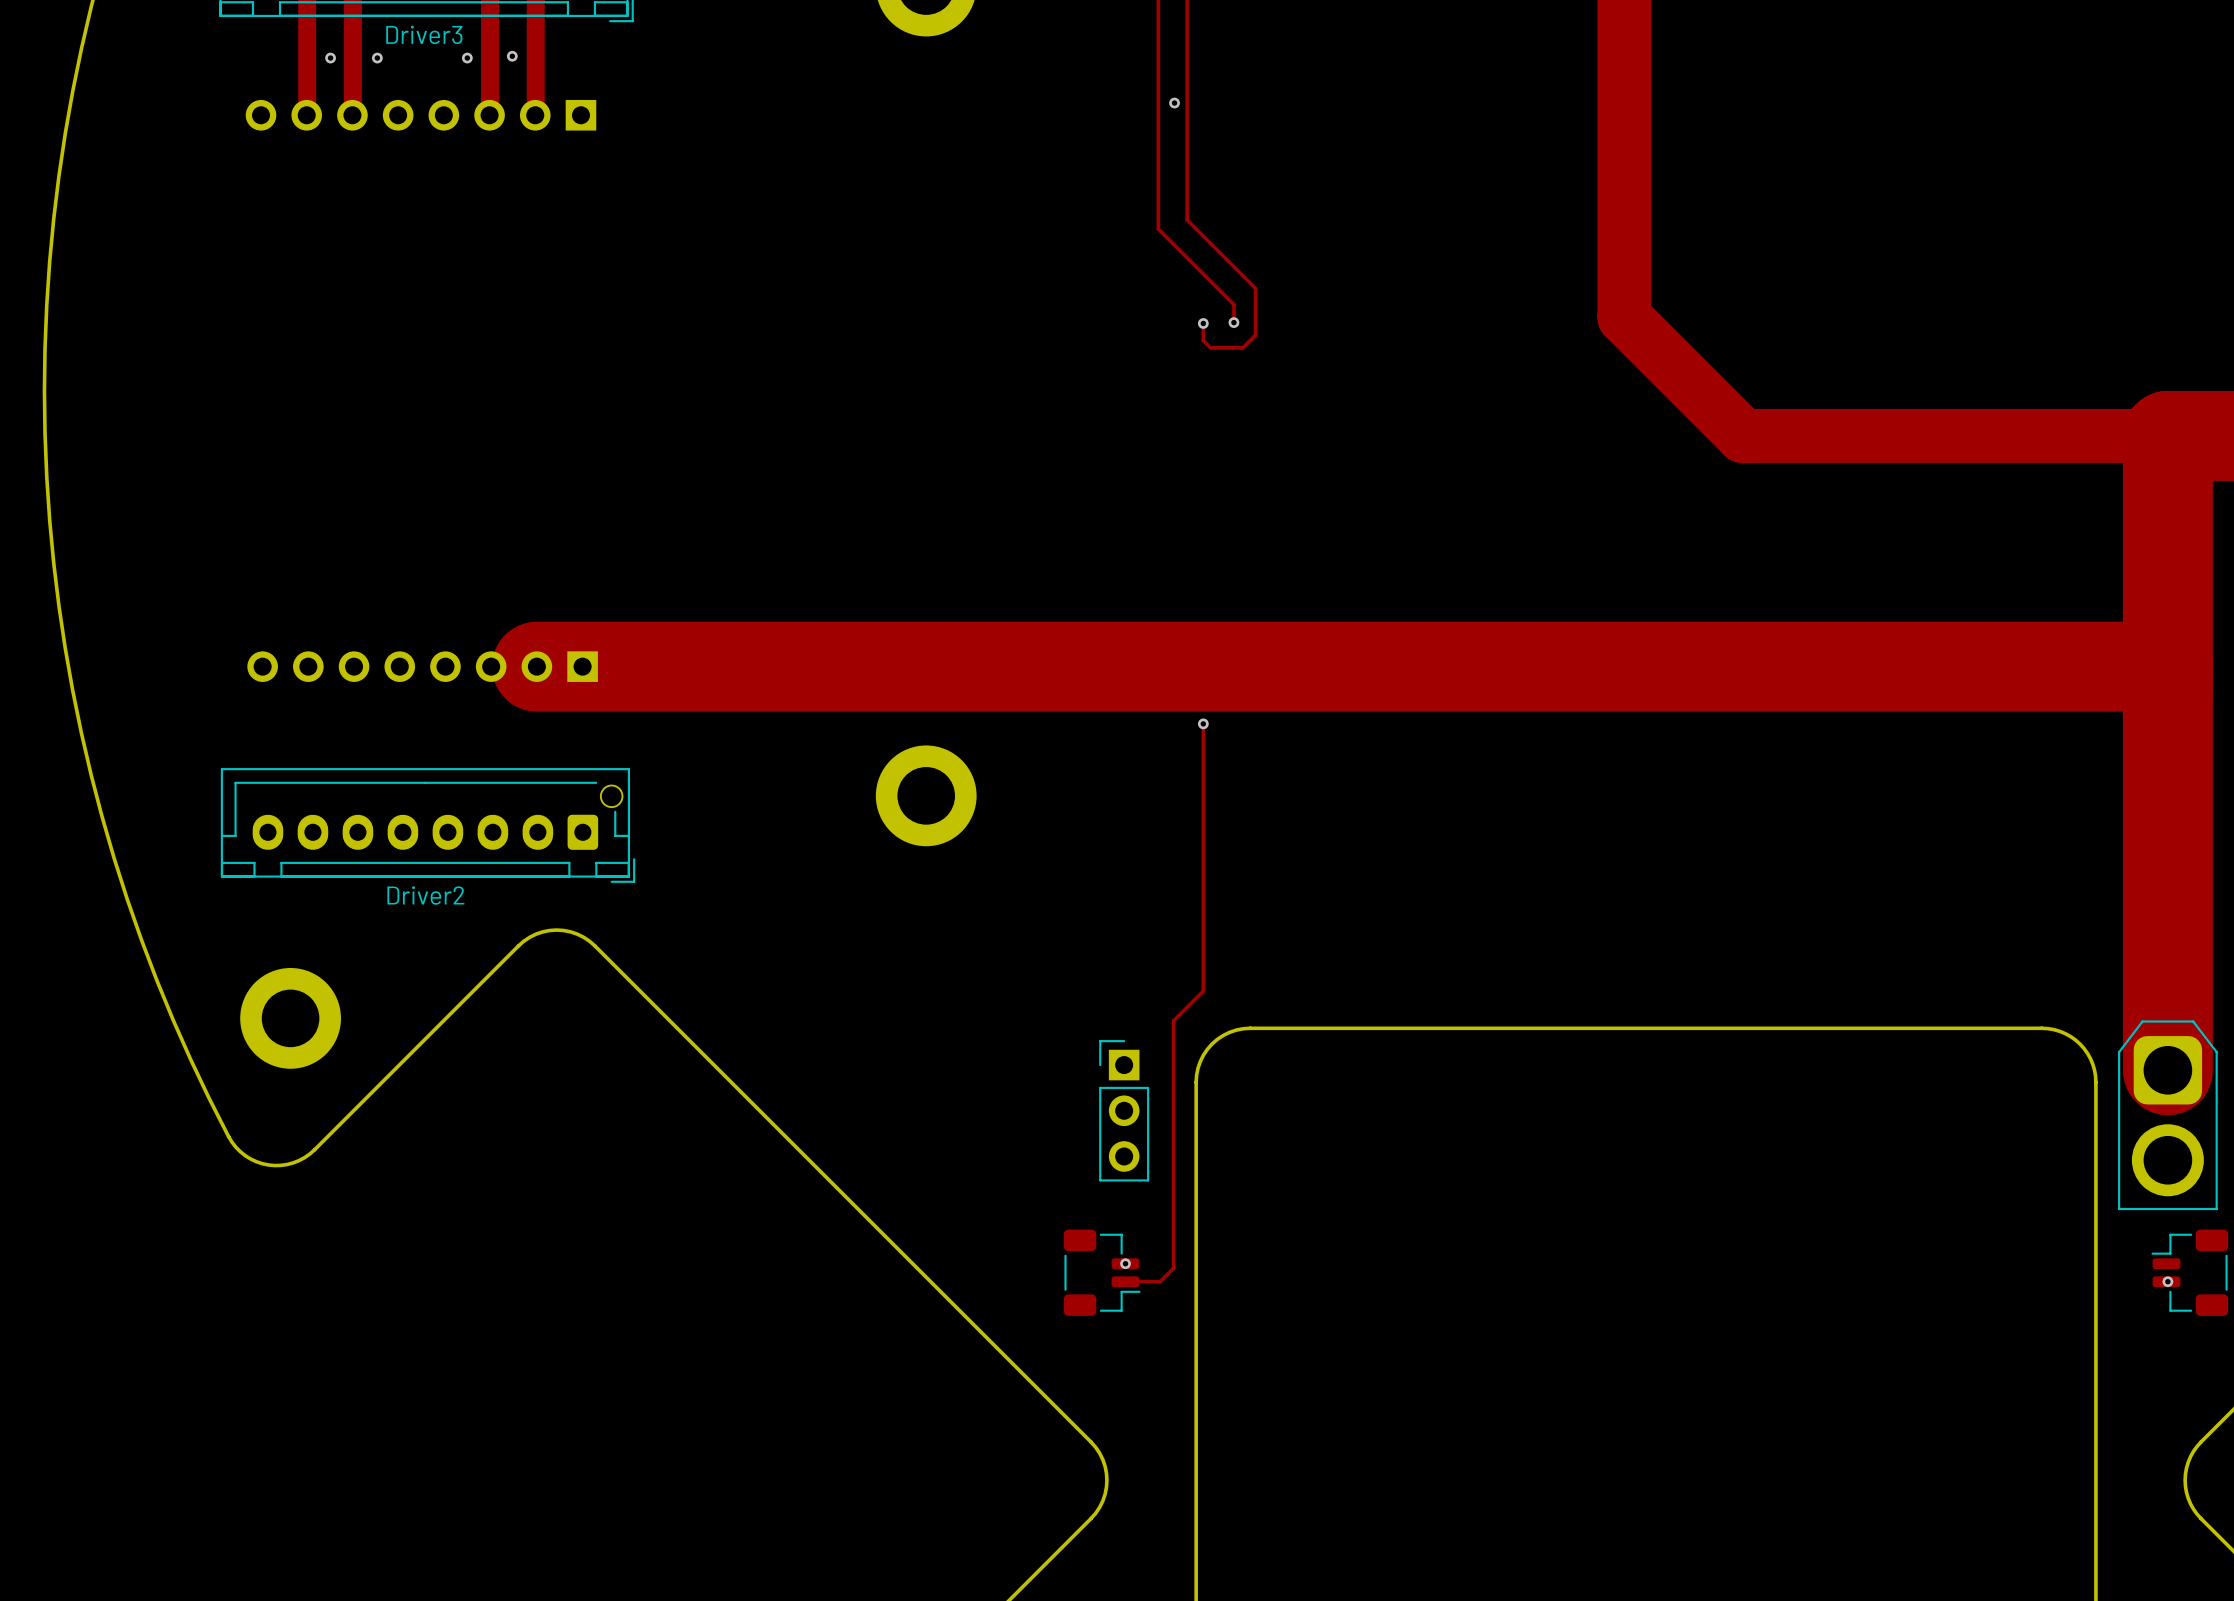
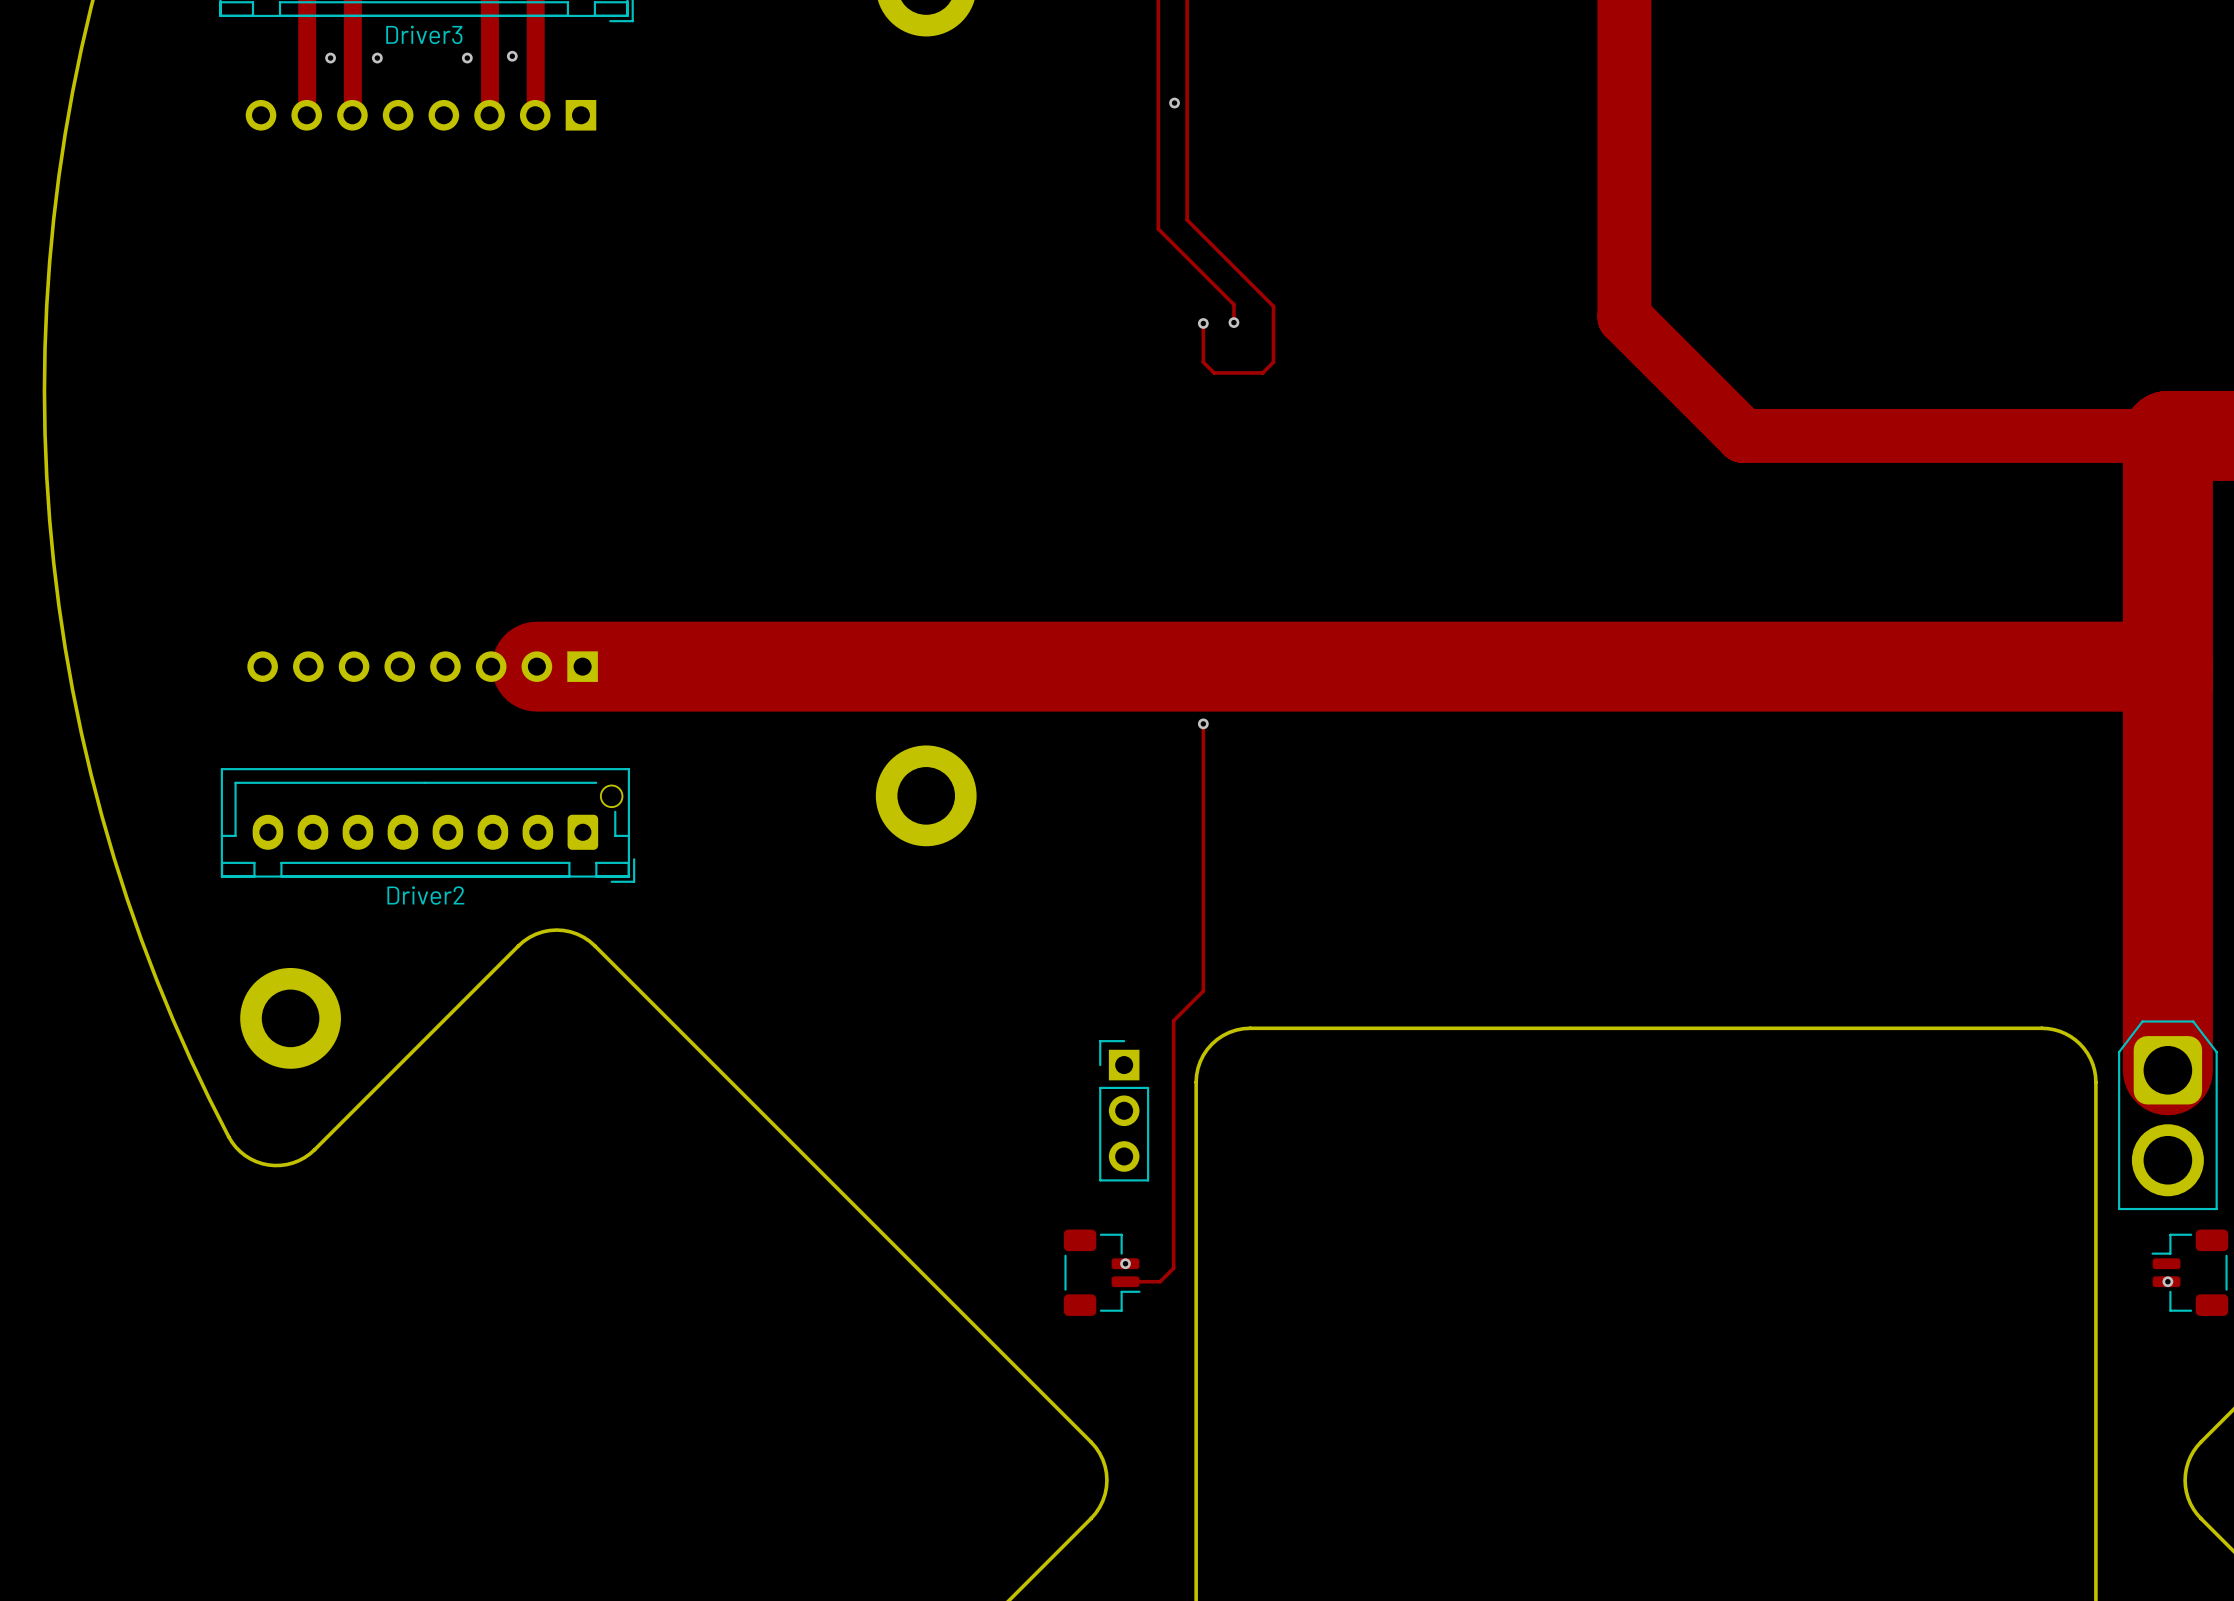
track: (1255, 288) (1255, 335) (1242, 347) (1210, 347) (1203, 340) -> (1255, 288) (1273, 306) (1273, 362) (1262, 372) (1214, 372) (1203, 362) (1203, 340)

